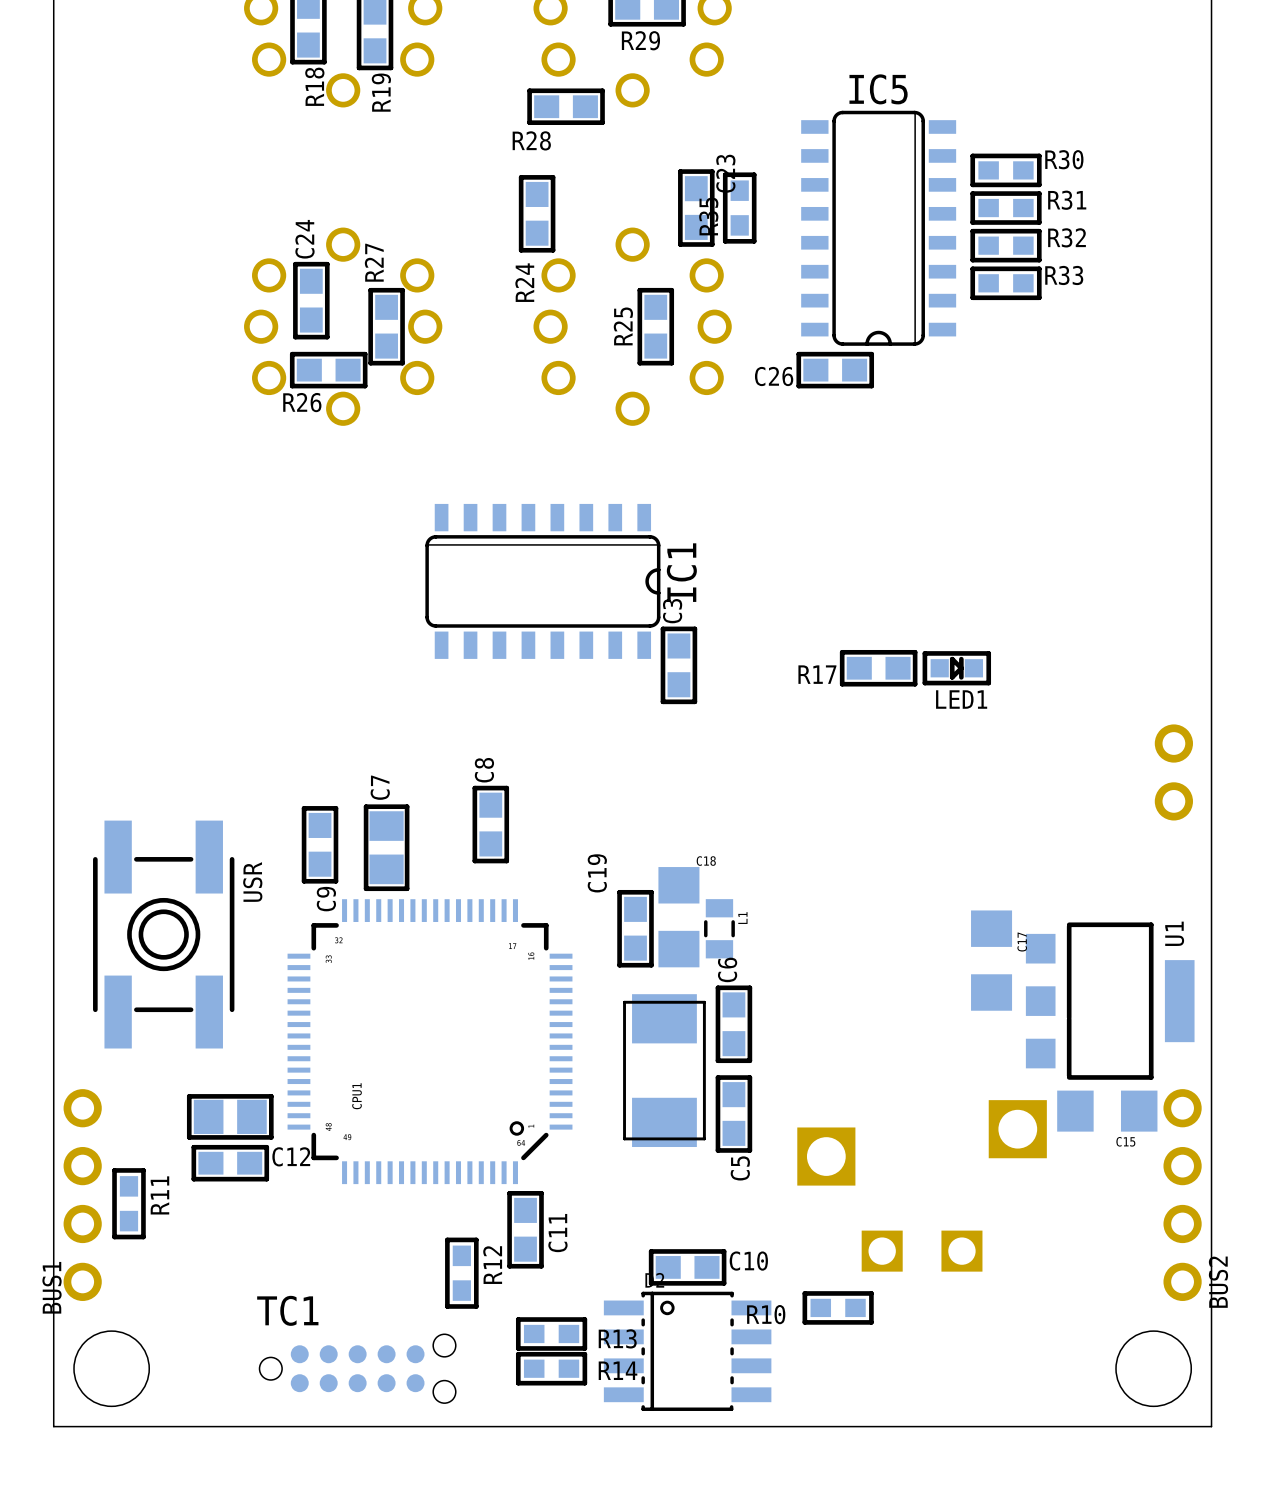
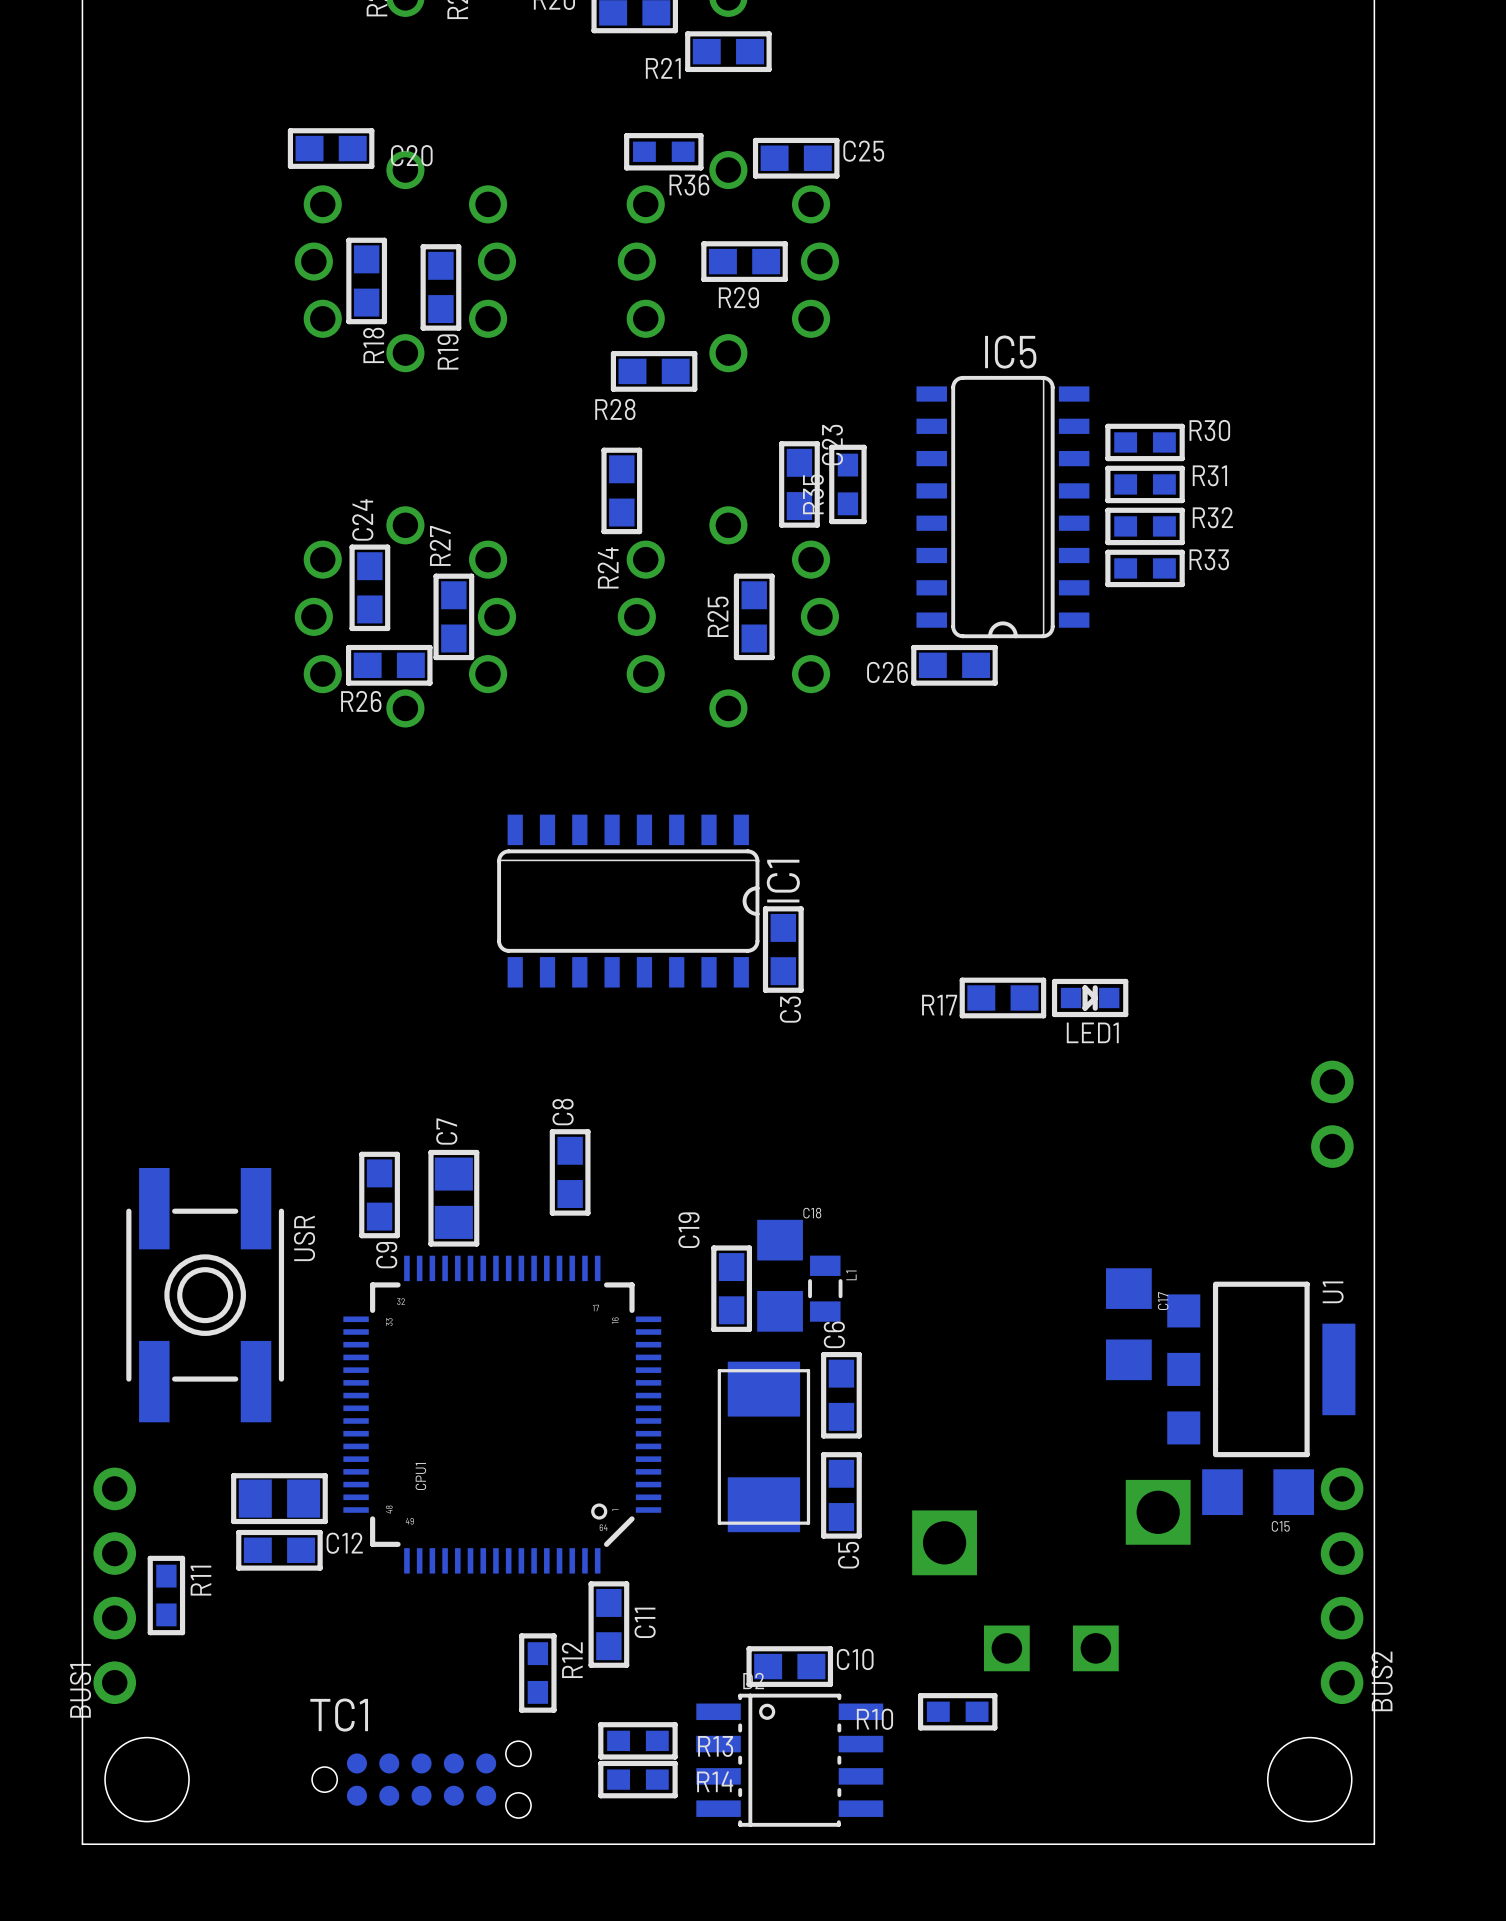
C3 name position: C3 (672, 611) -> C3 (790, 1009)
C3 position: (678, 665) -> (783, 949)

